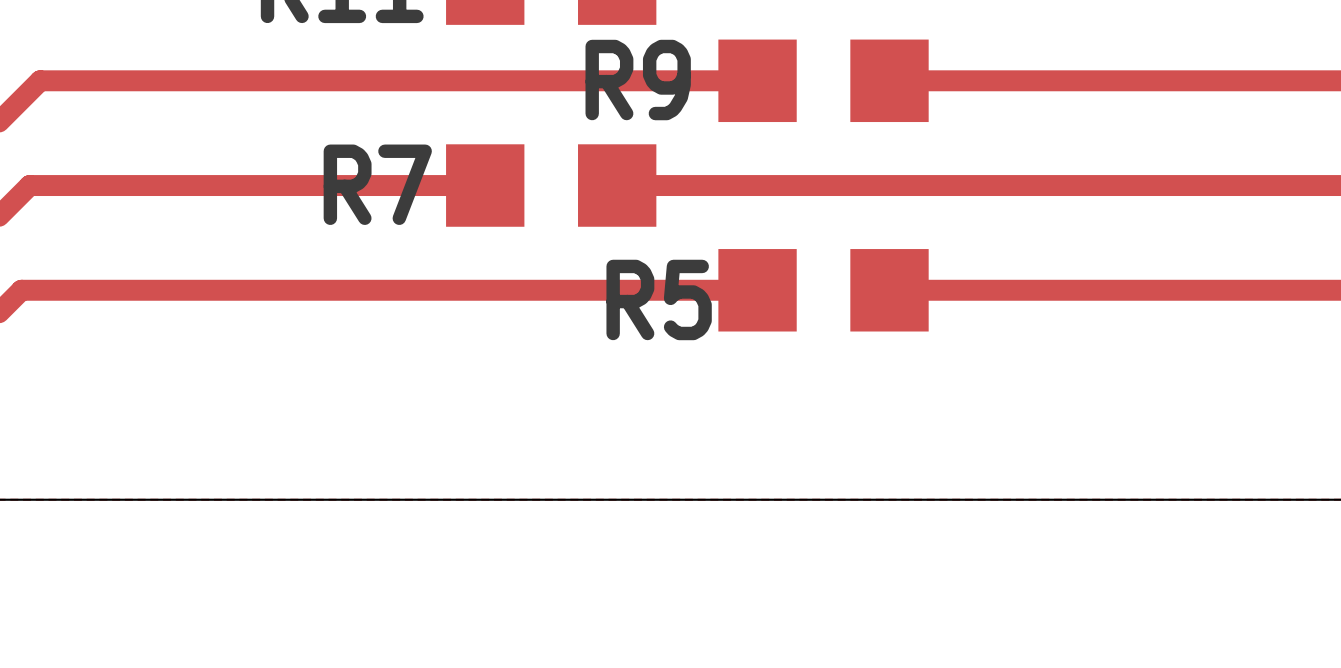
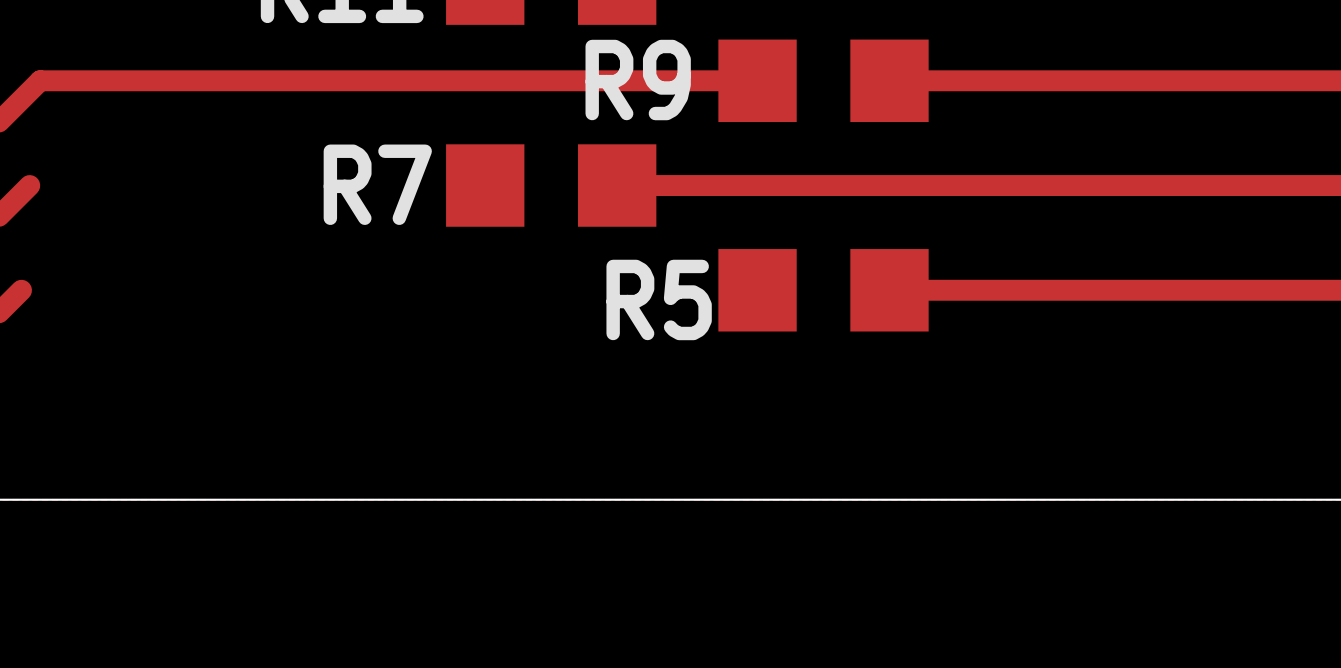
top track: (29, 185) (485, 185) -> none
top track: (21, 290) (757, 290) -> none

